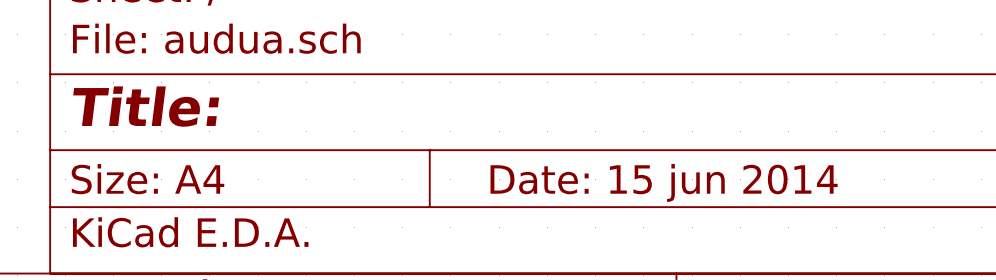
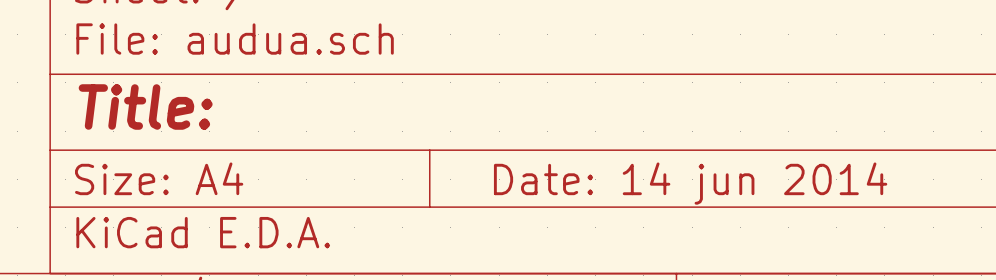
title block: Date: 15 jun 2014 (664, 182) -> Date: 14 jun 2014 (690, 183)

